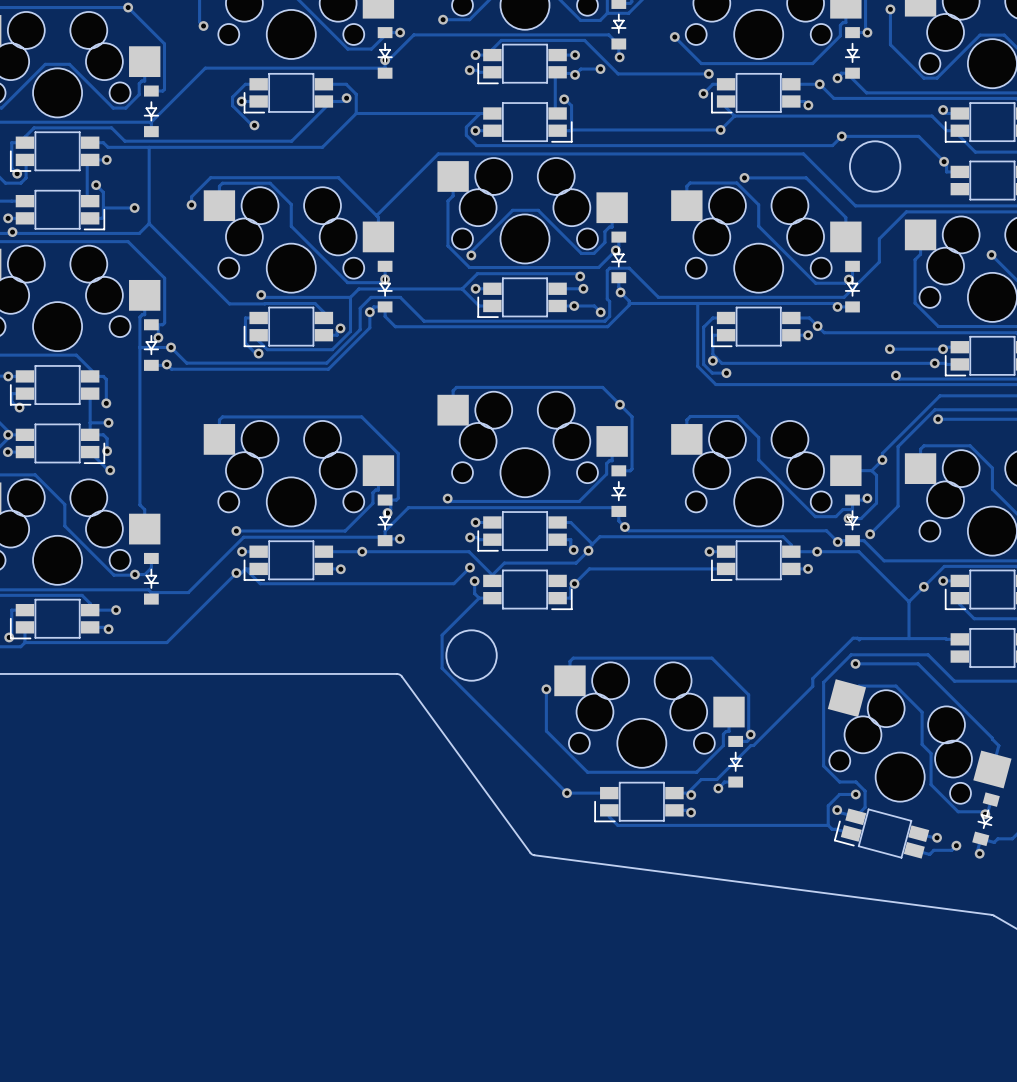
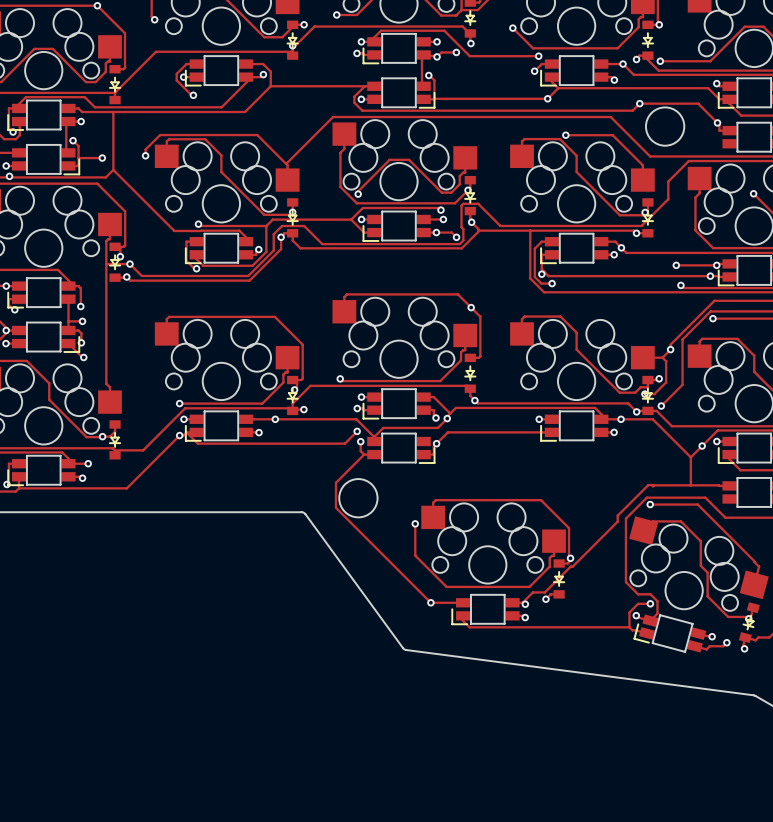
track: (890, 9) (890, 44) (923, 78) (937, 78) -> (660, 61) (710, 61) (712, 59)
via: (890, 9) -> none
via: none -> (660, 61)

